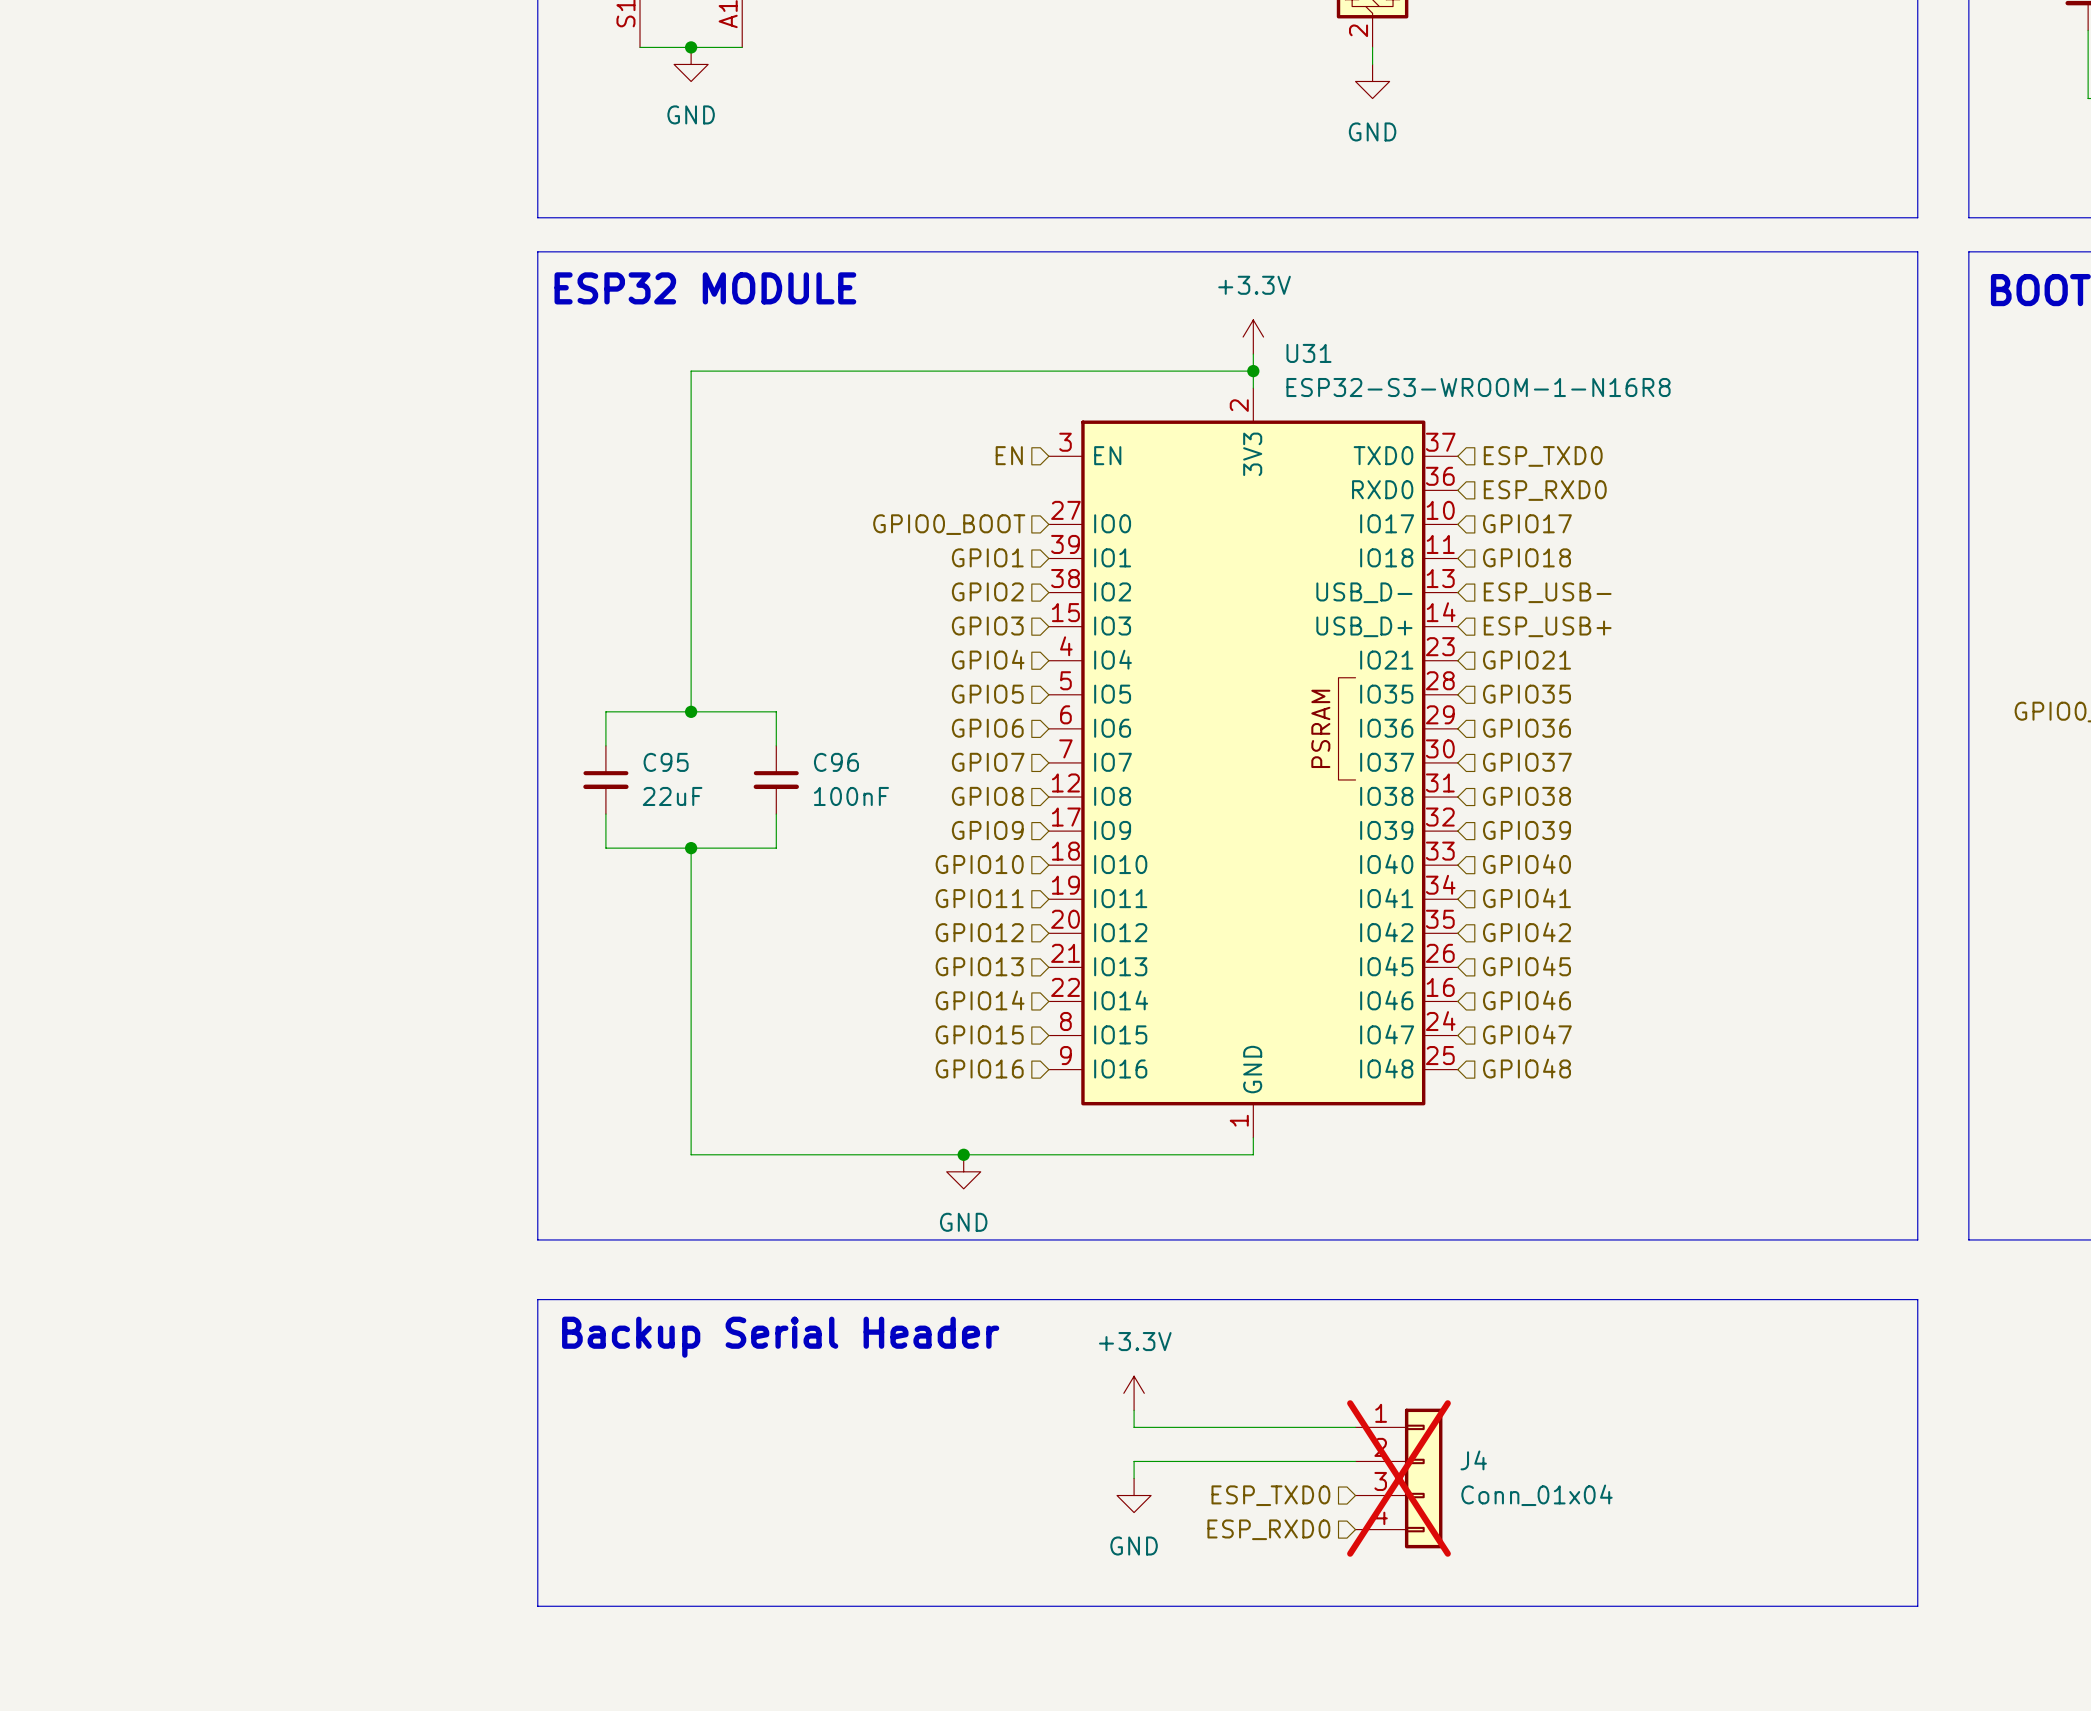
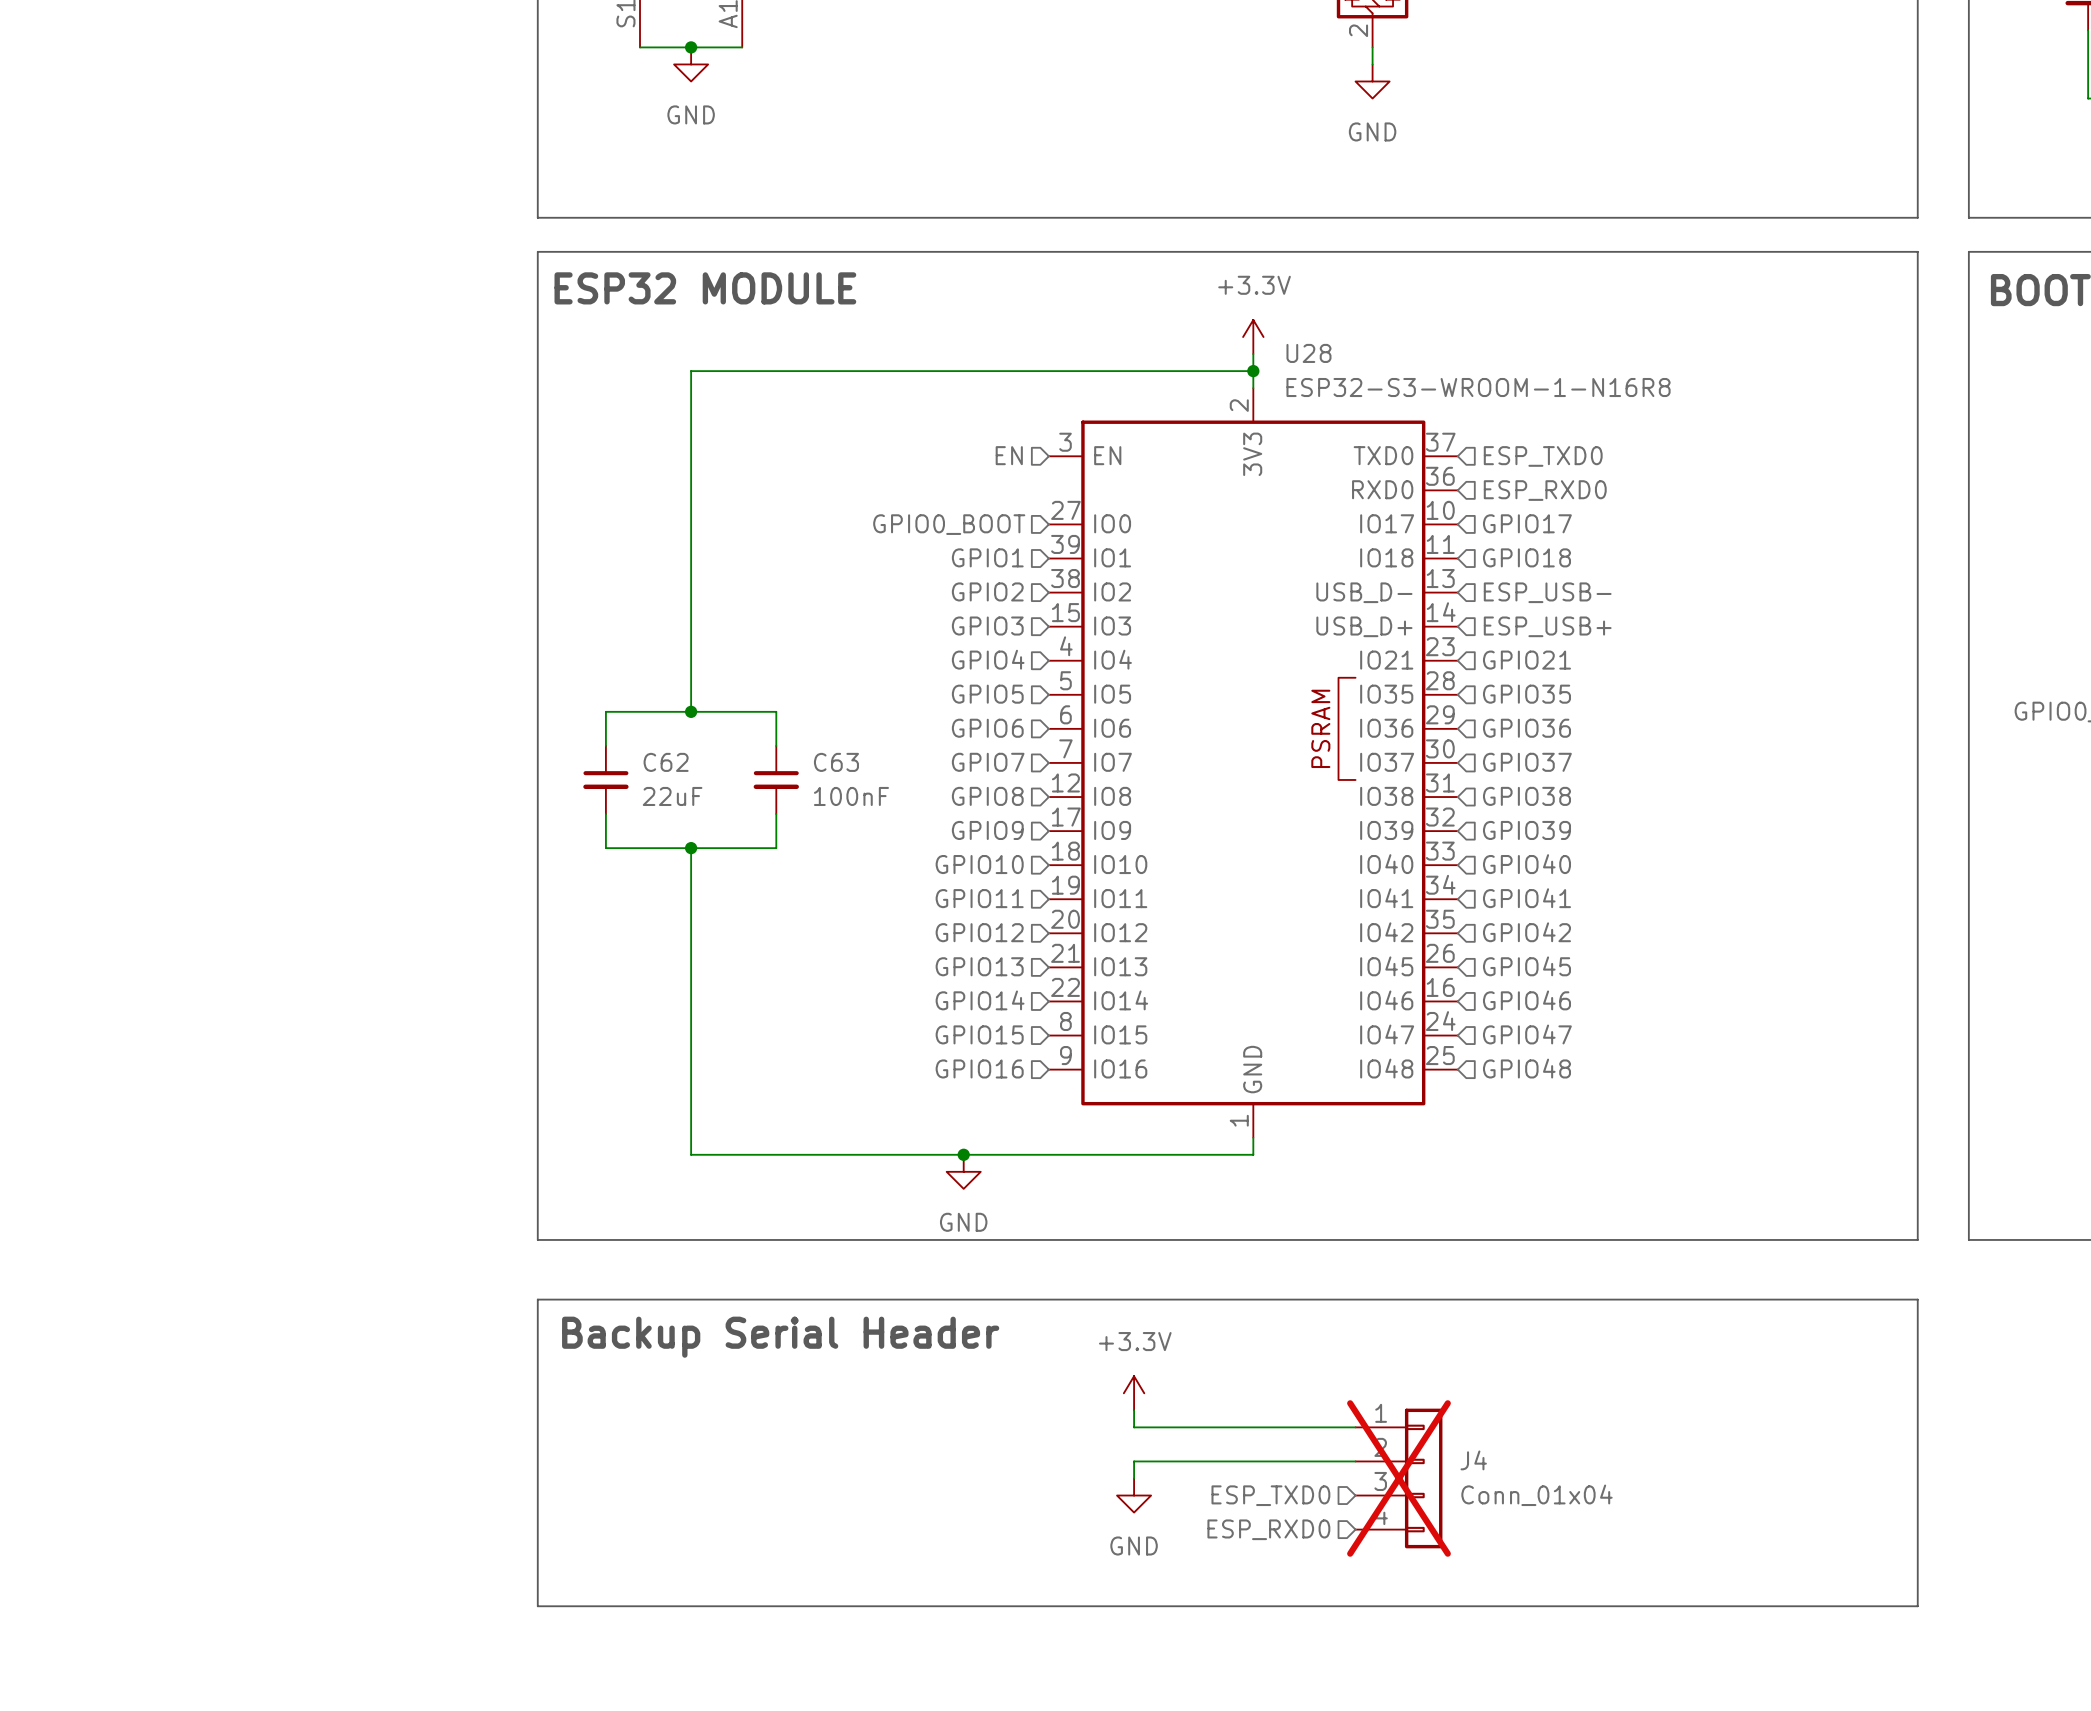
U31 name: U31 (1308, 353) -> U28 (1308, 353)
C95 name: C95 (666, 762) -> C62 (666, 762)
C96 name: C96 (836, 762) -> C63 (836, 762)

